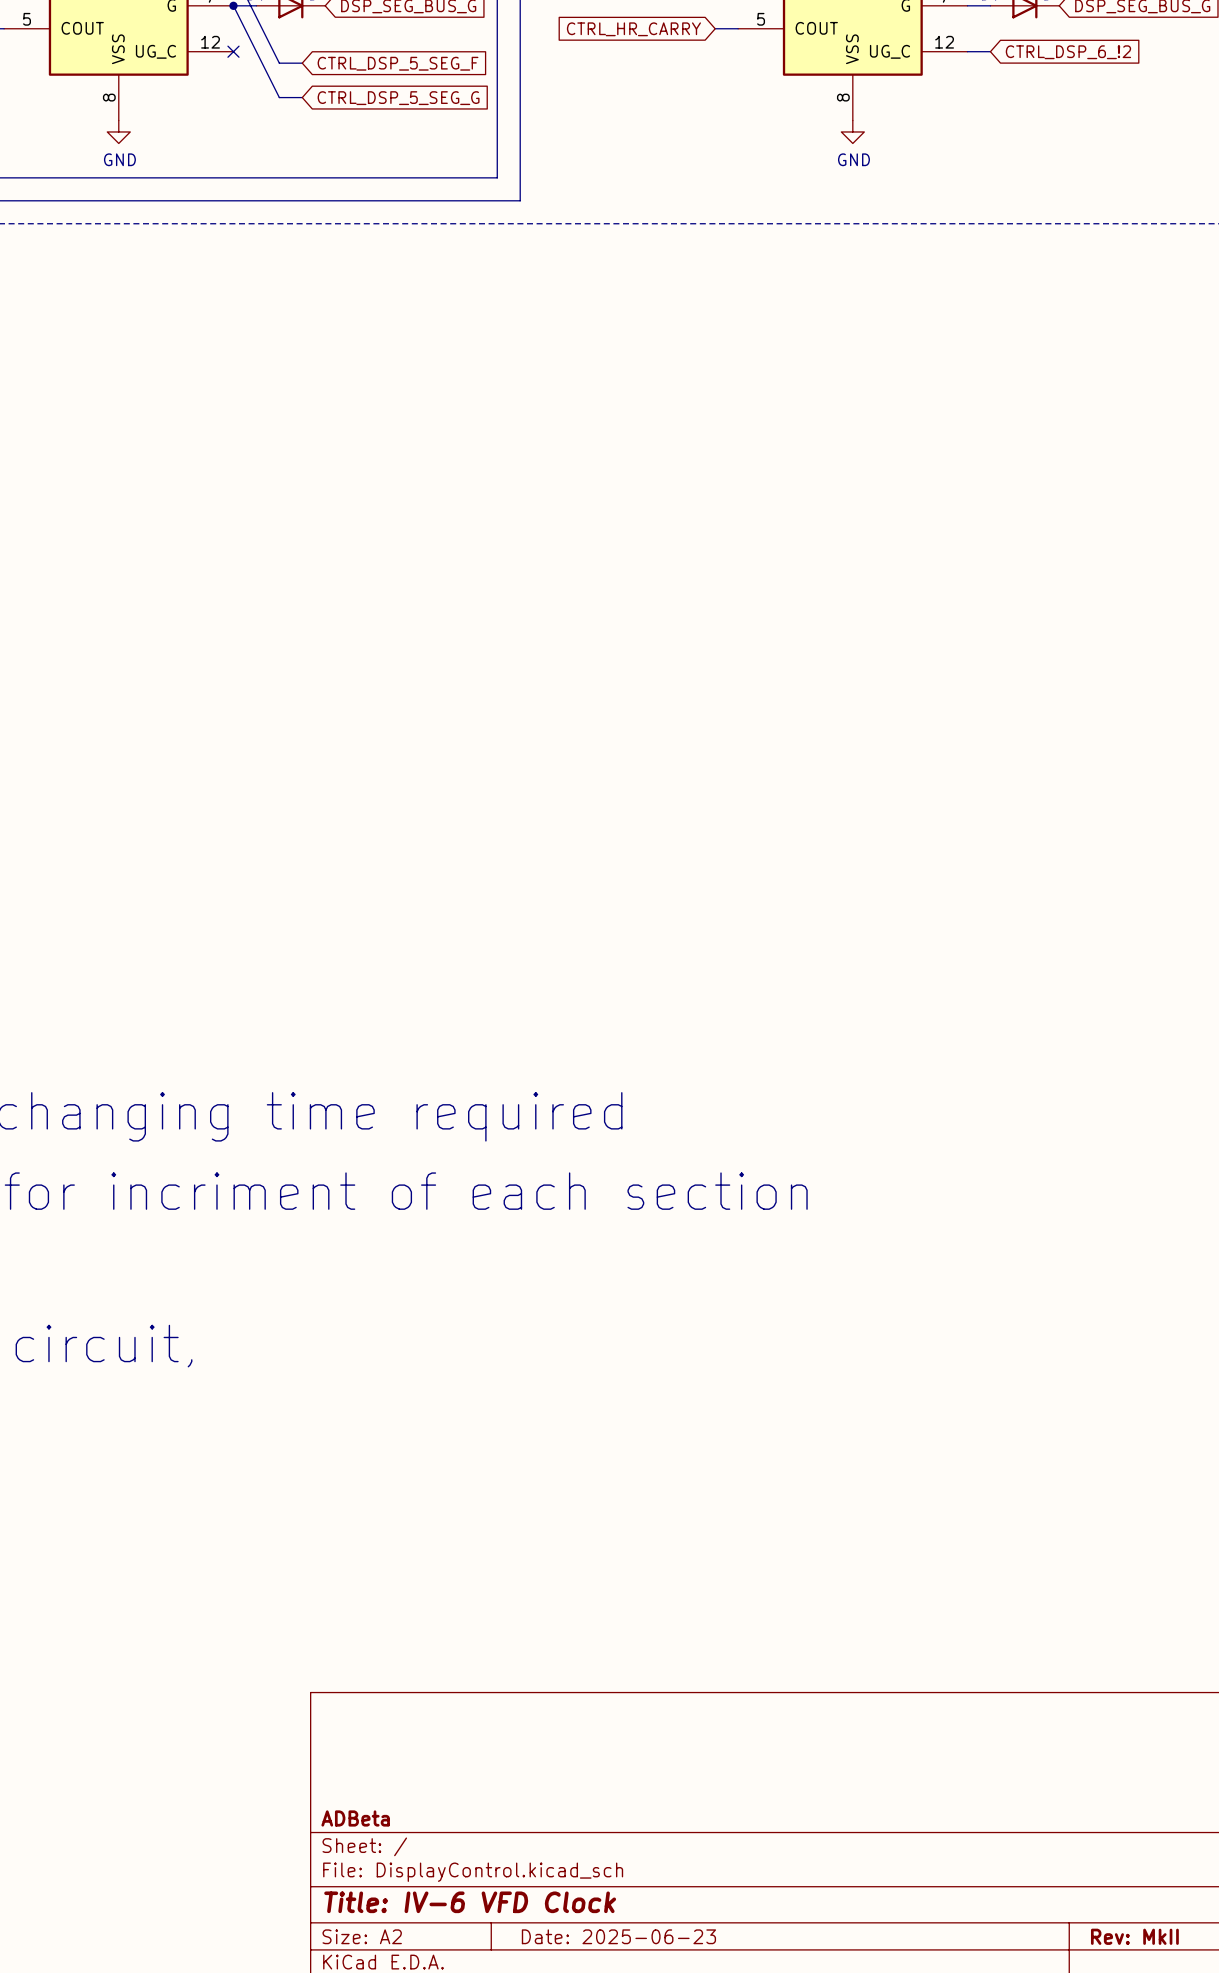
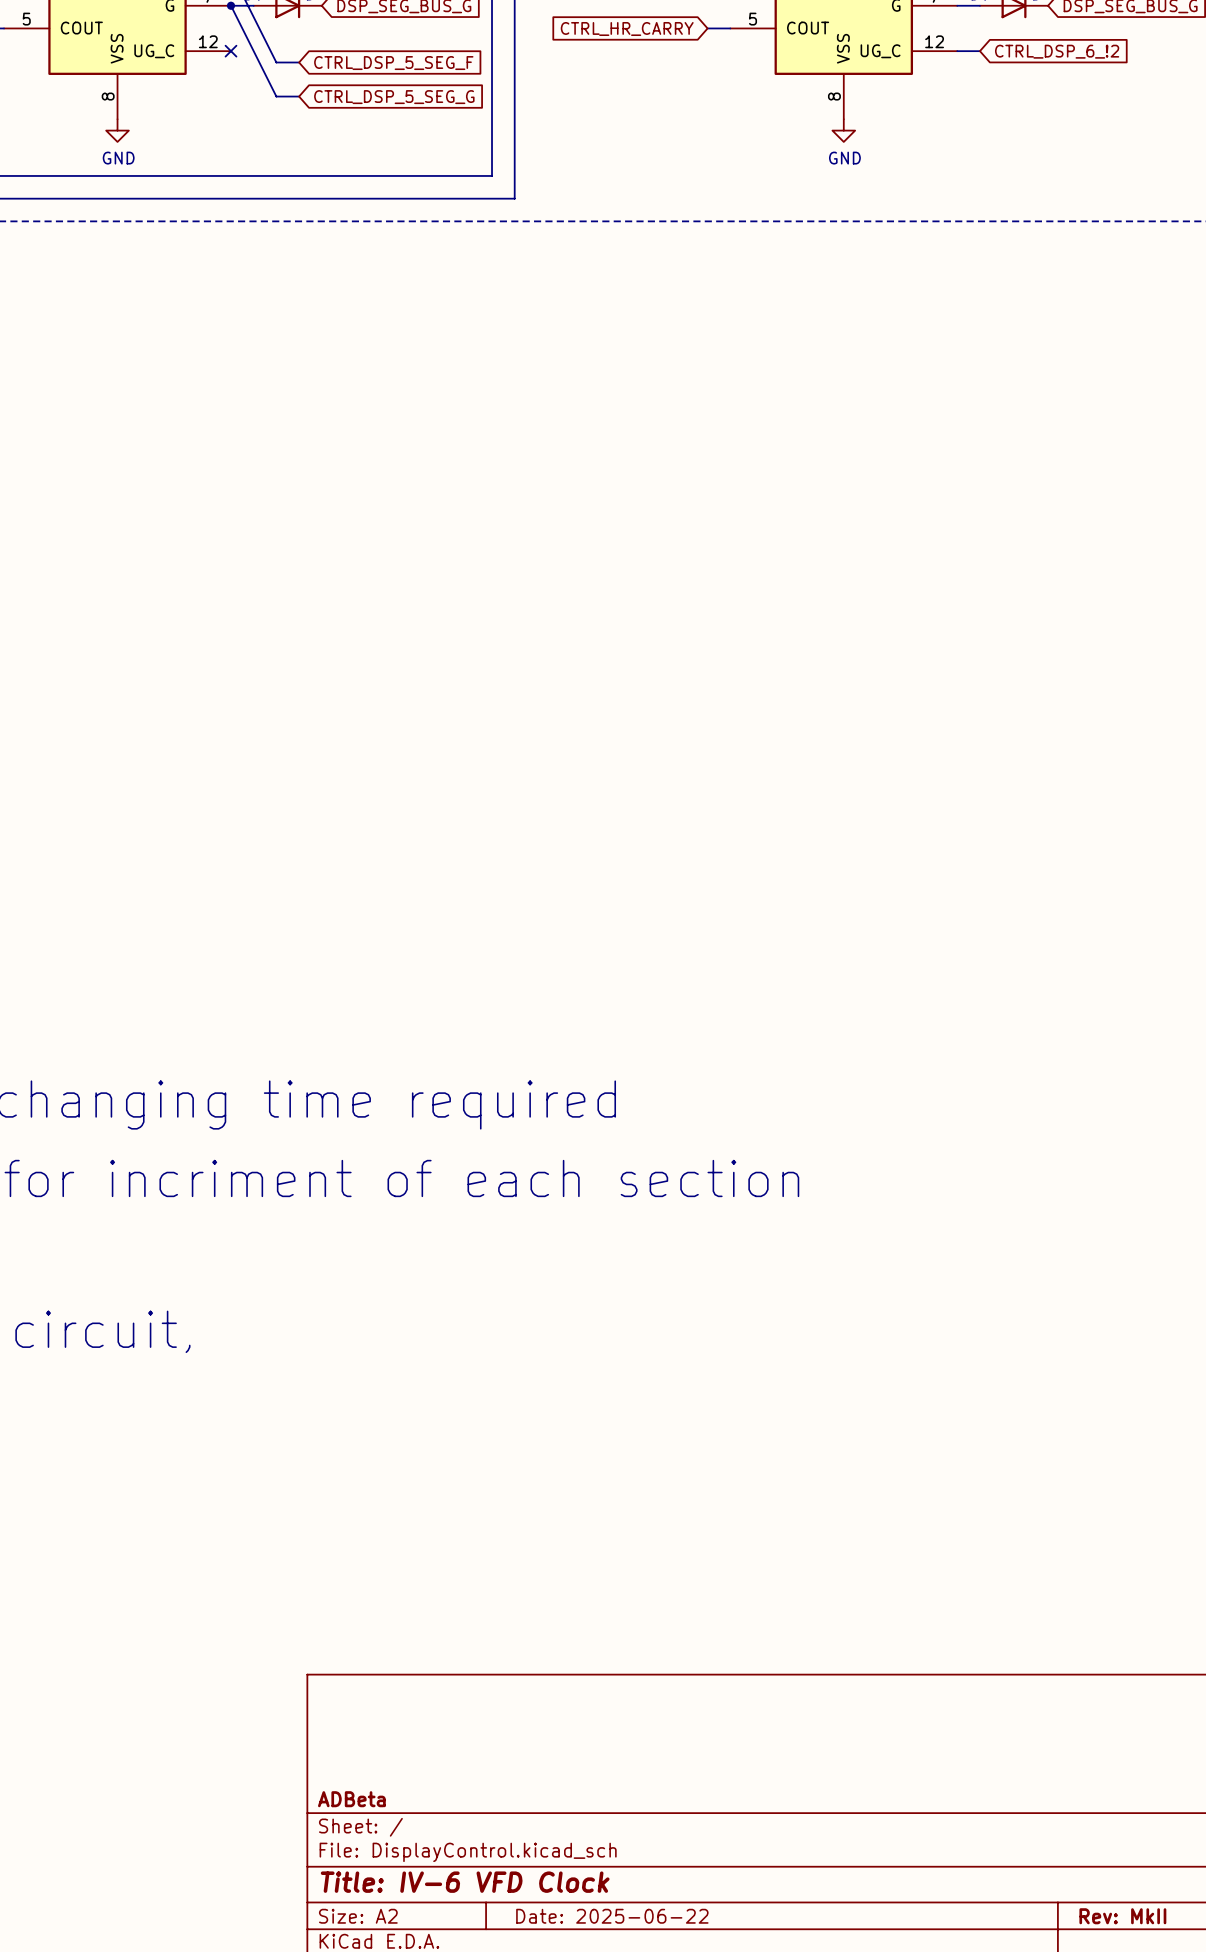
title block: Date: 2025-06-23 (618, 1936) -> Date: 2025-06-22 (612, 1916)

